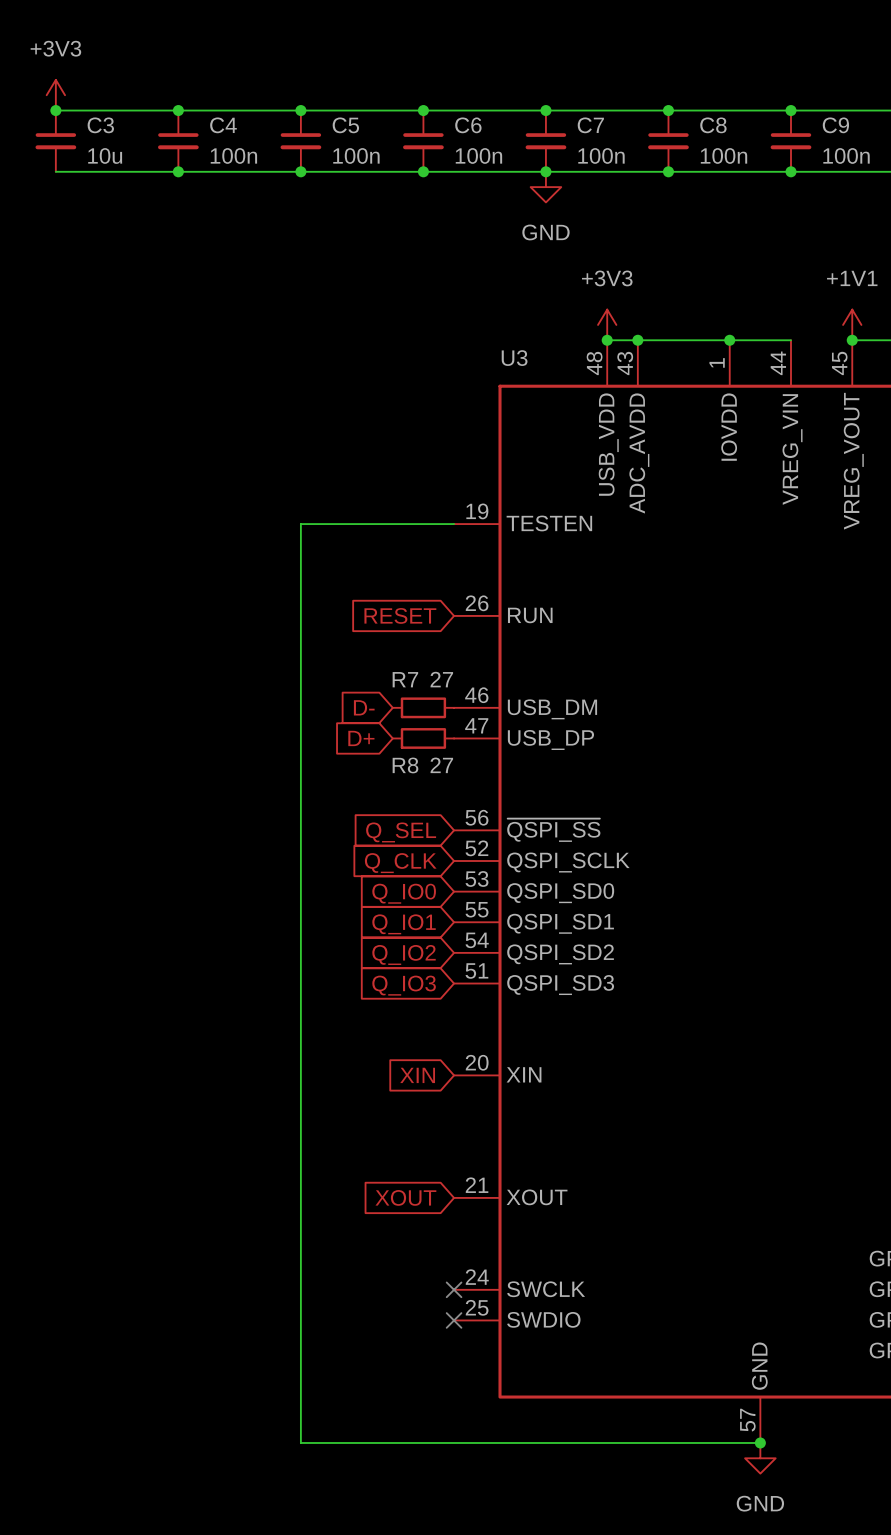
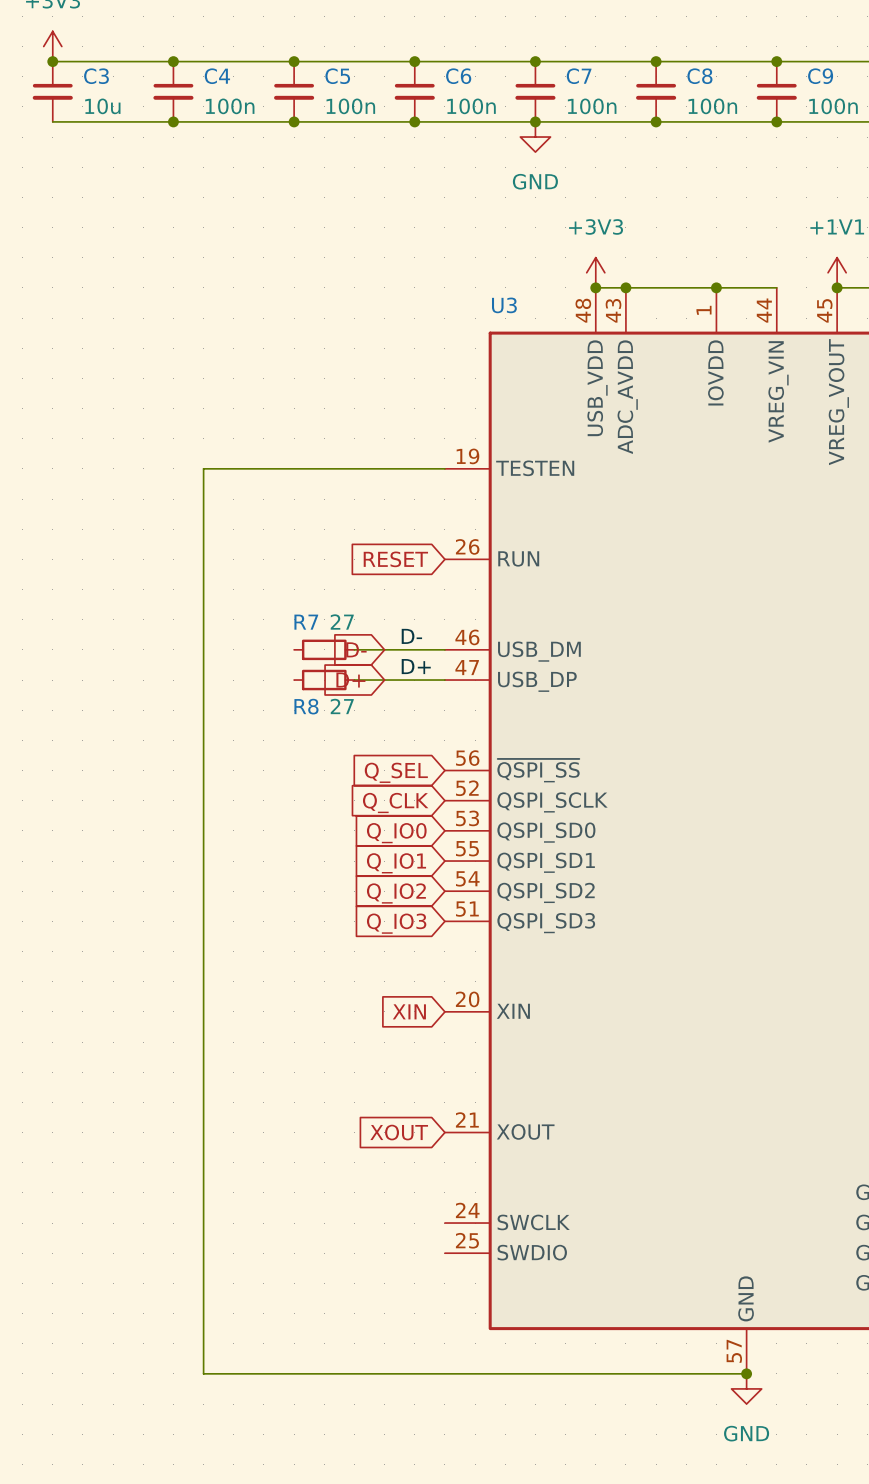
wire: (300, 524) (300, 1442) -> (294, 468) (203, 468) (203, 1373) (294, 1373)
label: none -> D- (411, 636)
wire: none -> (354, 649) (444, 649)
R7 position: (423, 707) -> (324, 649)
label: none -> D+ (416, 666)
wire: none -> (354, 680) (444, 680)
R8 position: (423, 738) -> (324, 680)
no-connect mark: (454, 1289) -> none
no-connect mark: (454, 1320) -> none

